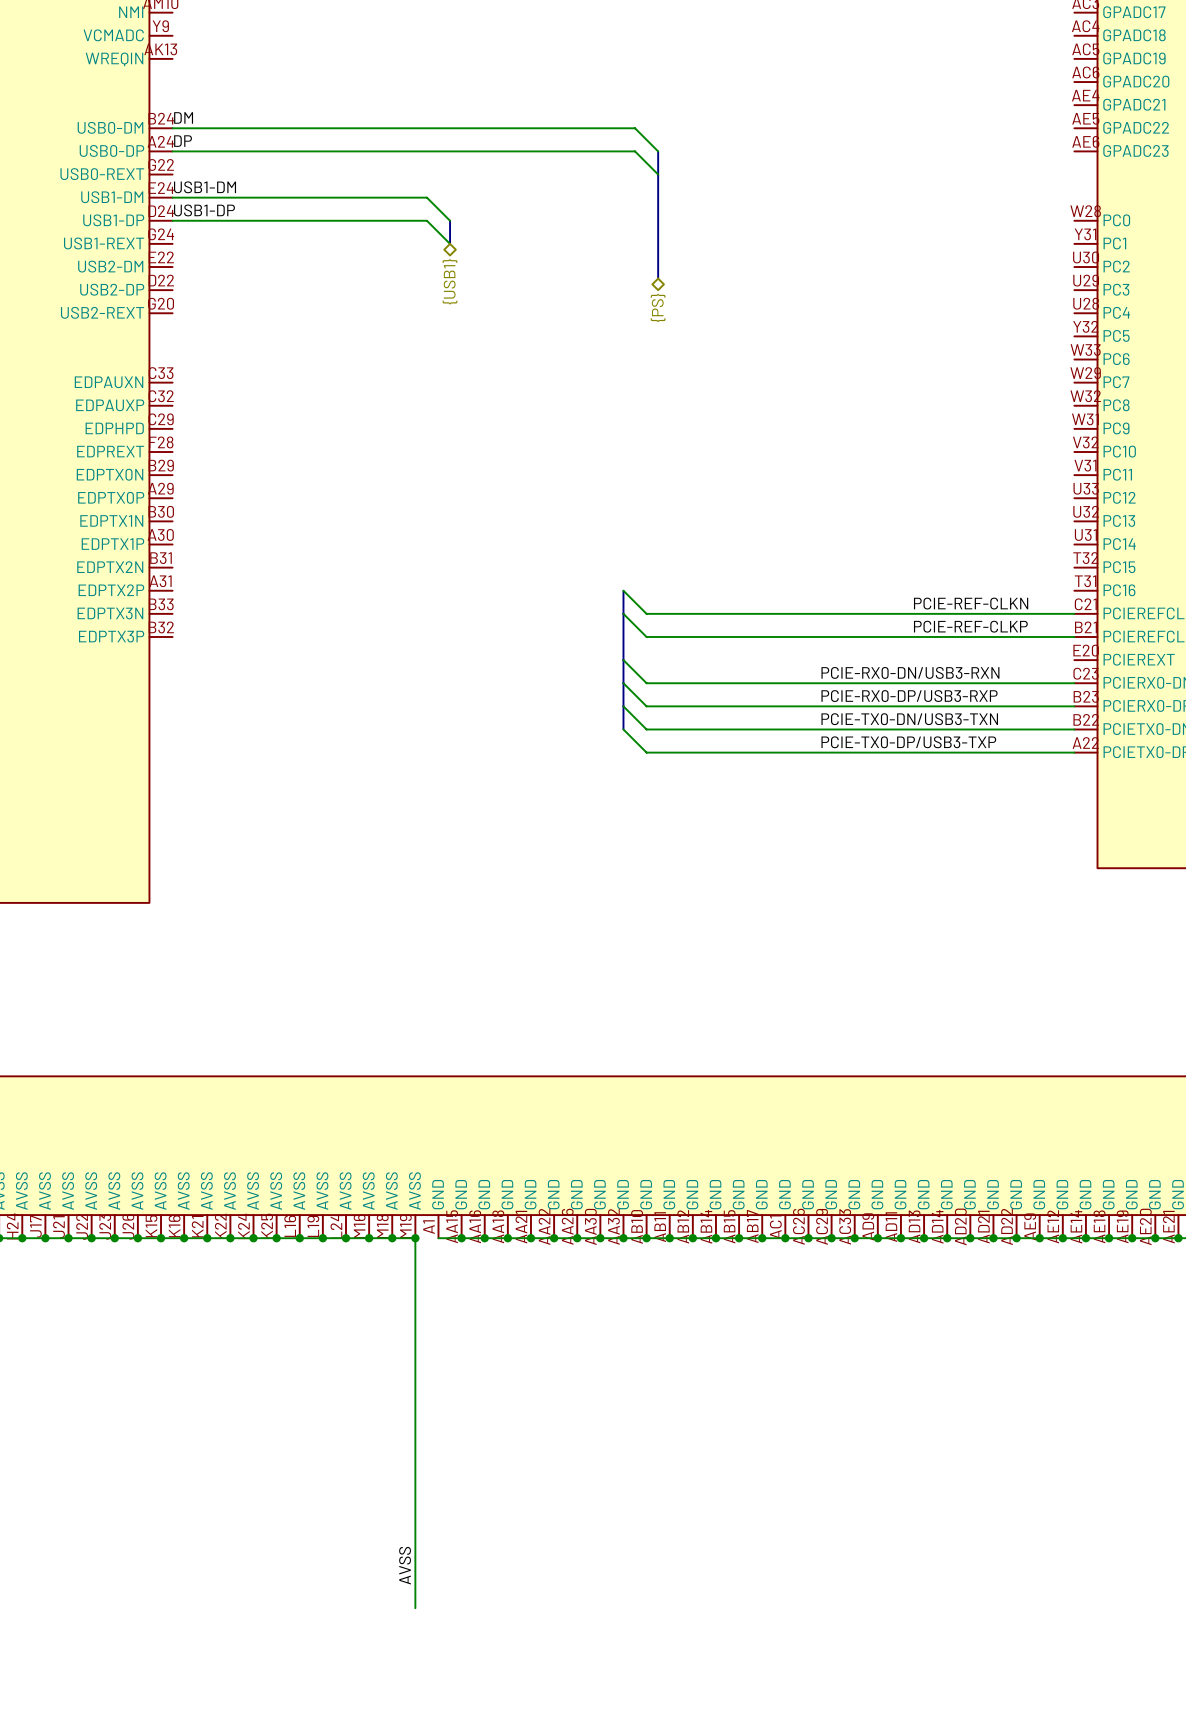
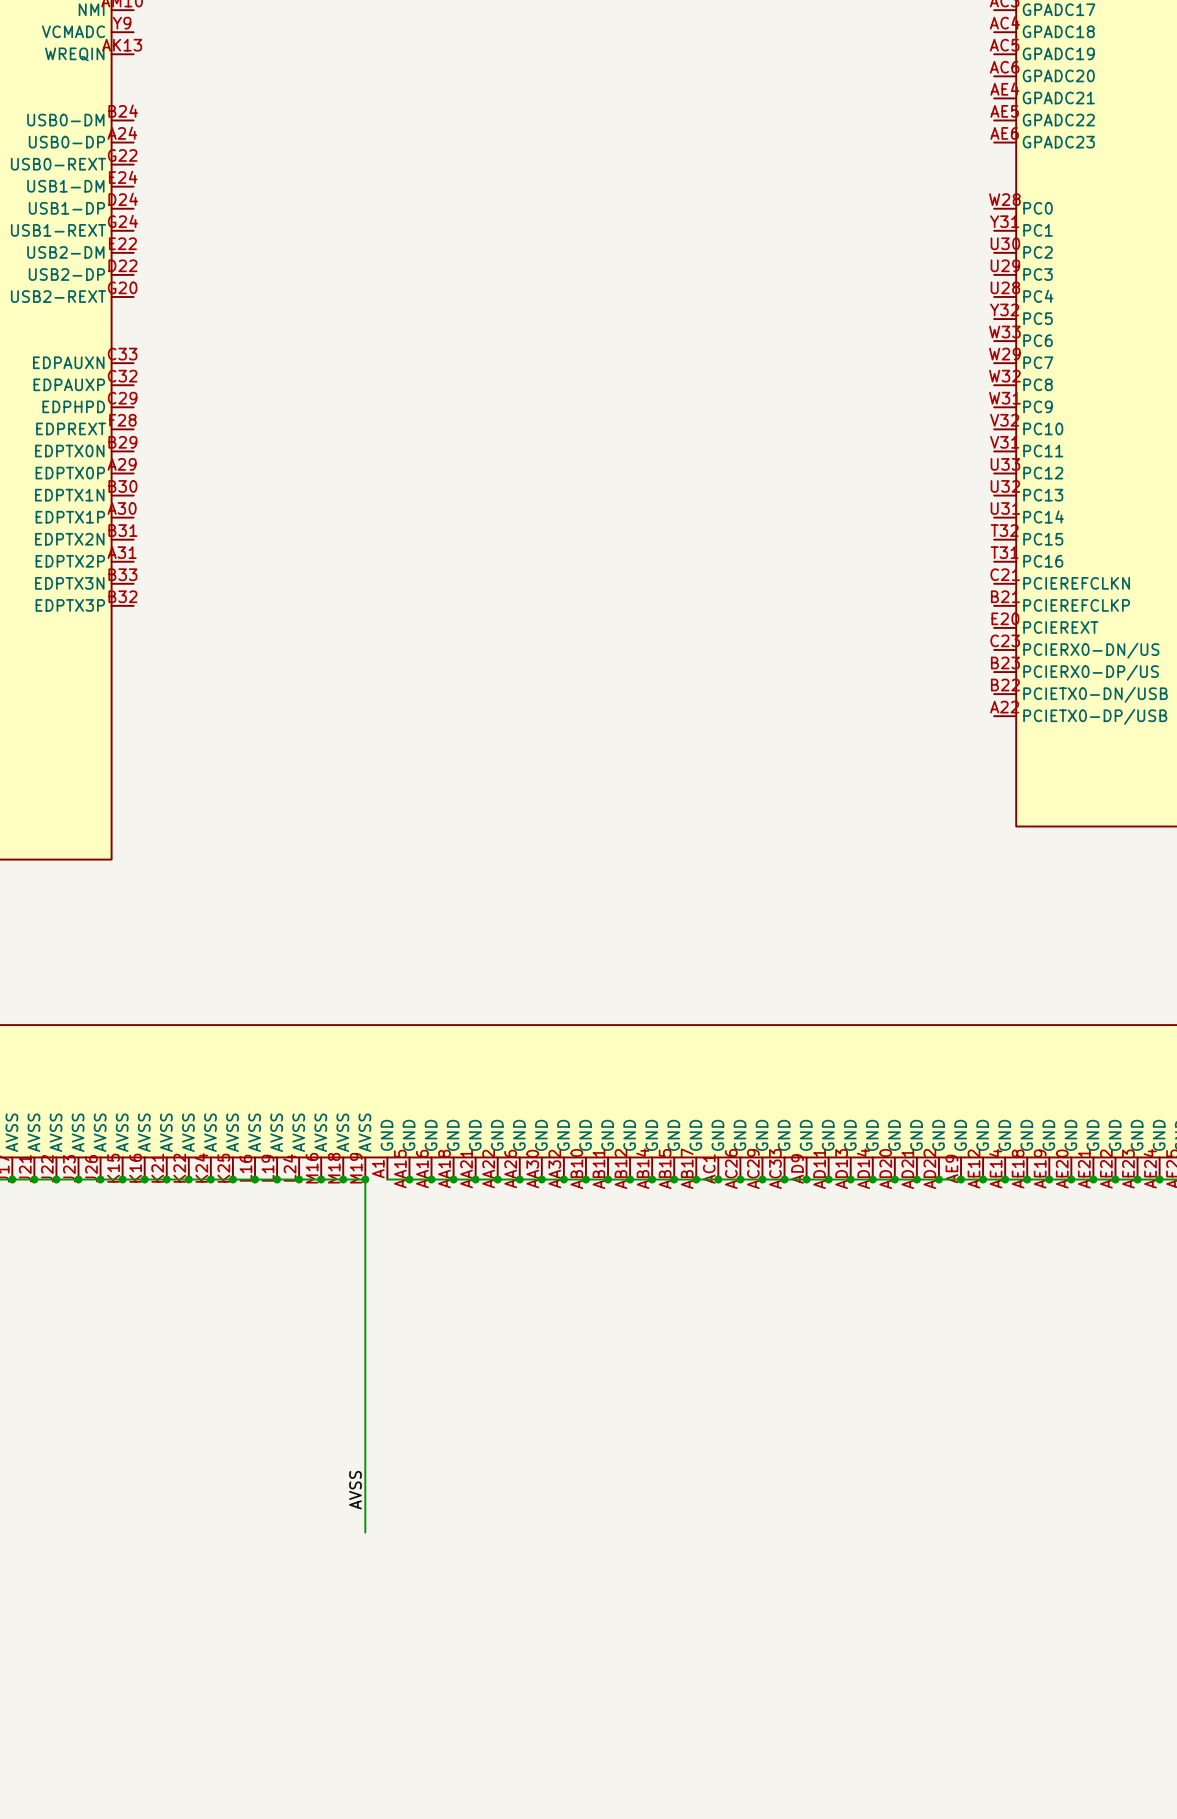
label: DM (183, 117) -> none
wire: (172, 128) (635, 128) (658, 151) -> none
label: DP (183, 141) -> none
wire: (172, 151) (635, 151) (658, 174) -> none
bus: (658, 151) (658, 278) -> none
label: USB1-DM (205, 187) -> none
wire: (172, 197) (426, 197) (450, 220) -> none
label: USB1-DP (204, 210) -> none
wire: (172, 220) (426, 220) (450, 243) -> none
bus: (450, 220) (450, 243) -> none
hierarchical label: {USB1} (450, 281) -> none
hierarchical label: {PS} (658, 307) -> none
wire: (623, 590) (646, 613) (1074, 613) -> none
bus: (623, 590) (623, 729) -> none
label: PCIE-REF-CLKN (971, 603) -> none
wire: (623, 613) (646, 636) (1074, 636) -> none
label: PCIE-REF-CLKP (970, 626) -> none
wire: (623, 660) (646, 683) (1074, 683) -> none
label: PCIE-RX0-DN/USB3-RXN (910, 672) -> none
wire: (623, 683) (646, 706) (1074, 706) -> none
label: PCIE-RX0-DP/USB3-RXP (909, 696) -> none
wire: (623, 706) (646, 729) (1074, 729) -> none
label: PCIE-TX0-DN/USB3-TXN (909, 719) -> none
wire: (623, 729) (646, 752) (1074, 752) -> none
label: PCIE-TX0-DP/USB3-TXP (908, 742) -> none

